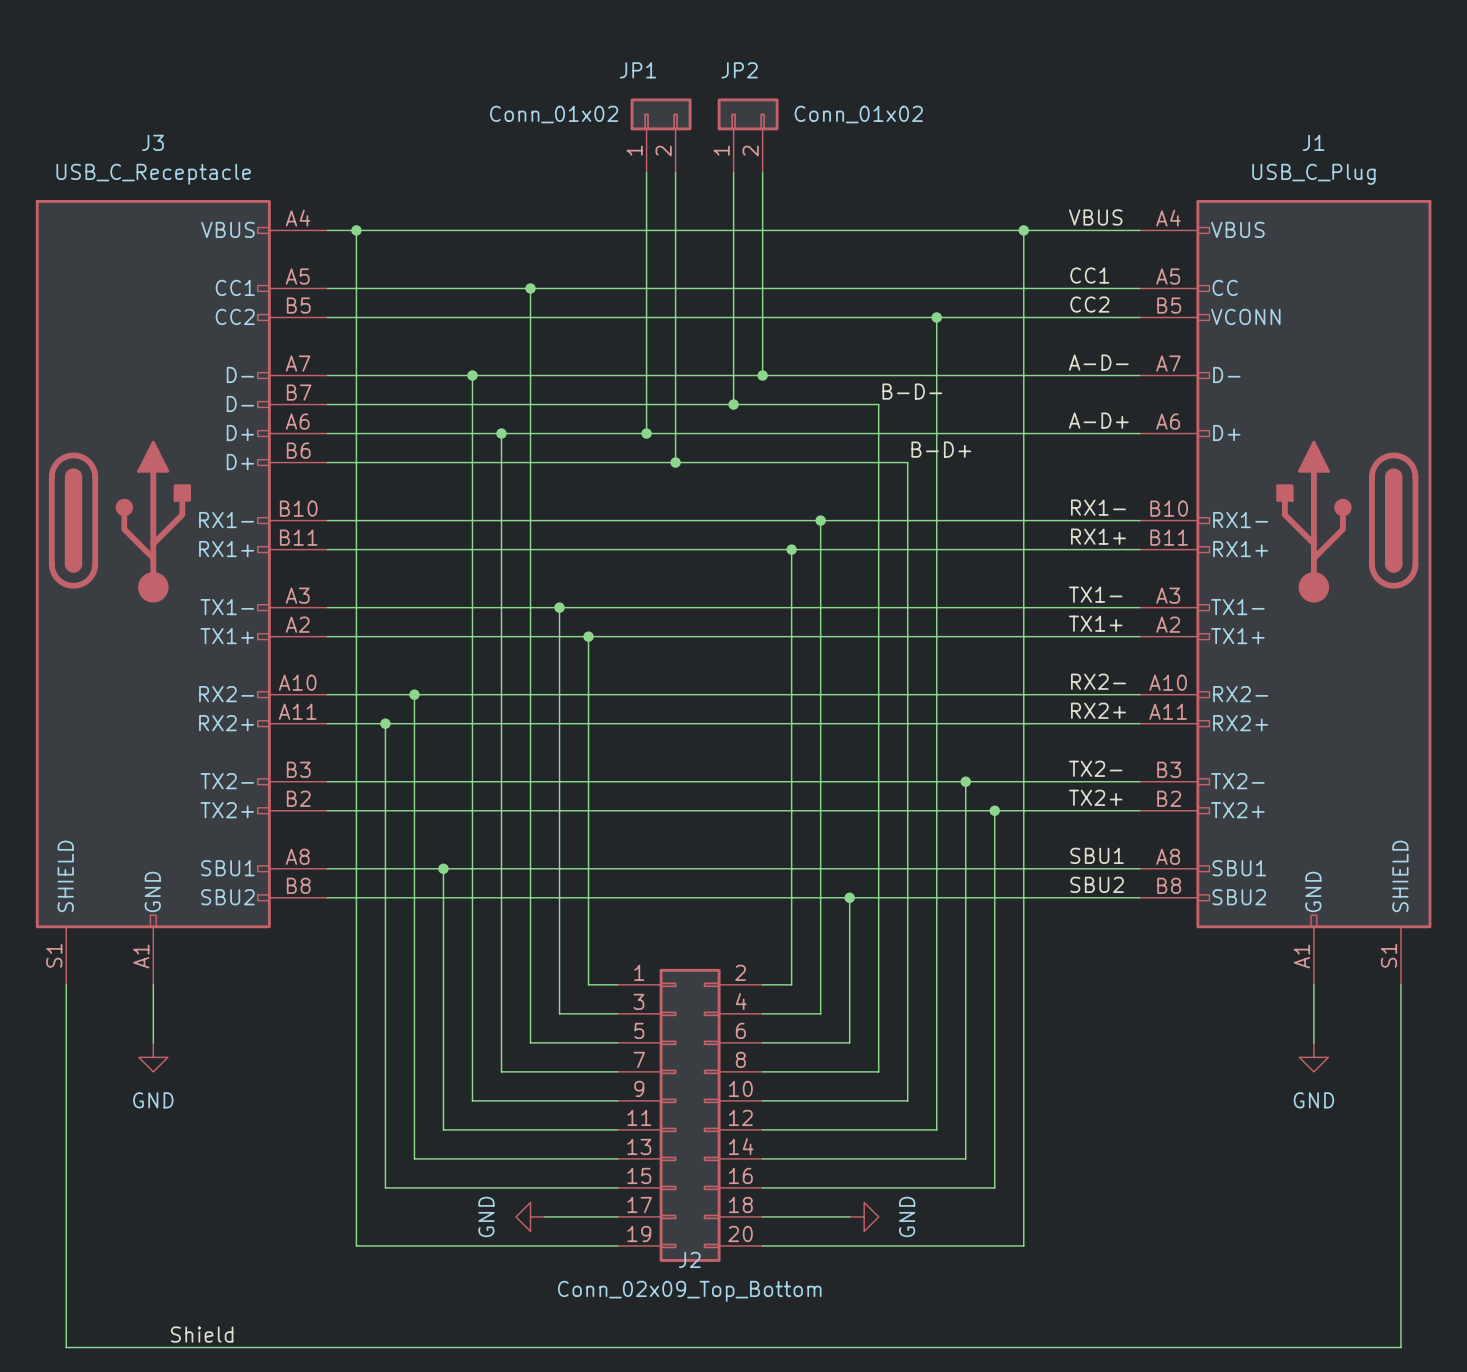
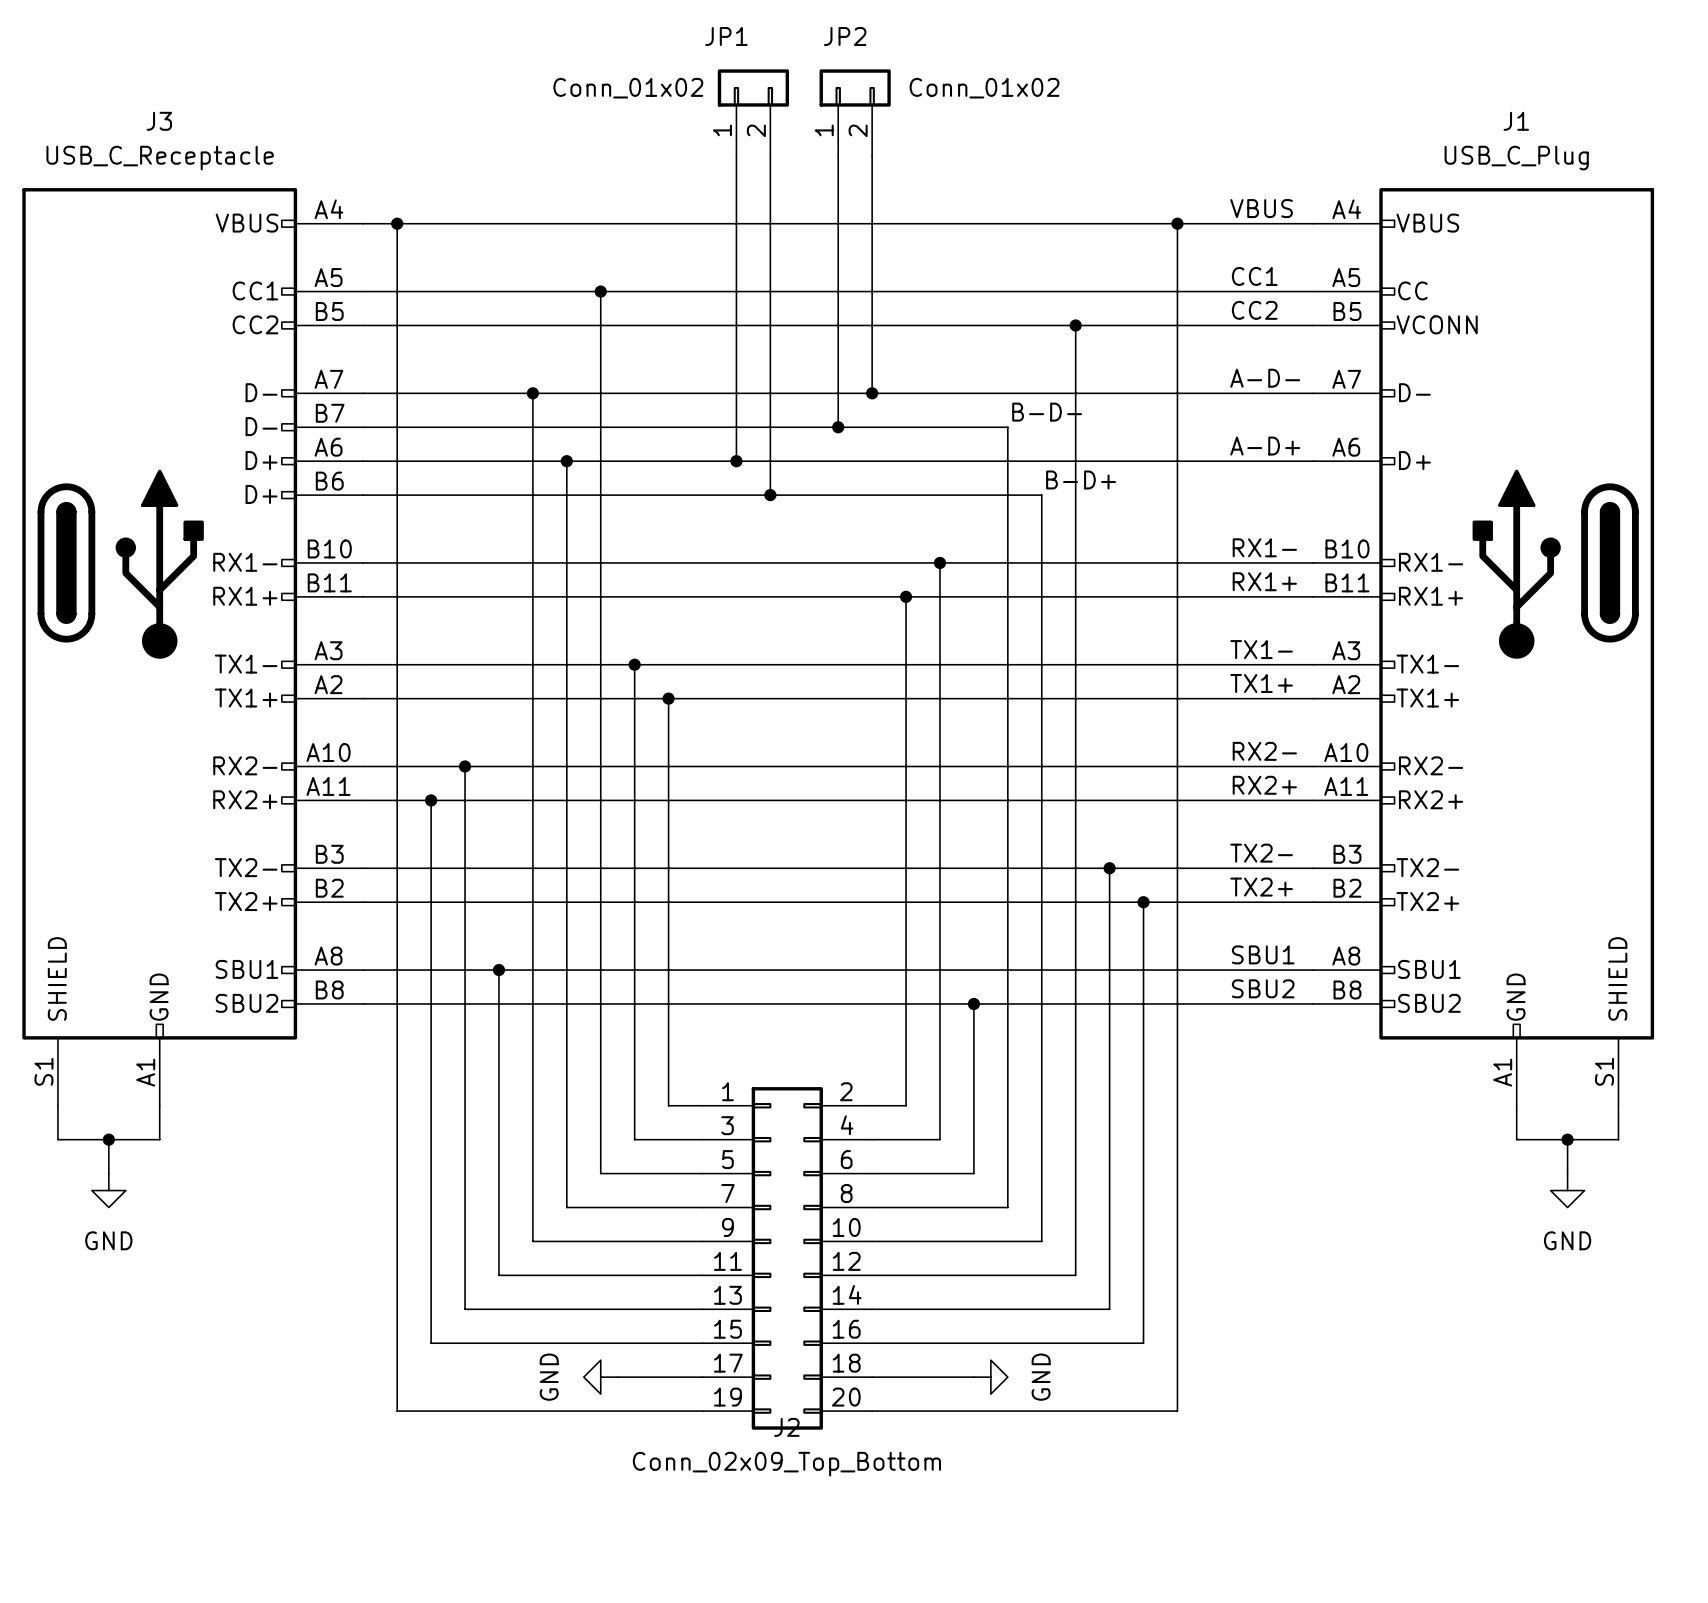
wire: (66, 1013) (66, 1347) (1400, 1347) (1400, 1013) -> none
wire: none -> (108, 1139) (108, 1173)
junction: none -> (108, 1139)
wire: (153, 1013) (153, 1042) -> (159, 1139) (57, 1139)
wire: (1313, 1013) (1313, 1042) -> (1516, 1139) (1618, 1139)
wire: none -> (1567, 1139) (1567, 1173)
junction: none -> (1567, 1139)
power symbol position: GND (153, 1057) -> GND (108, 1190)
power symbol position: GND (1313, 1057) -> GND (1567, 1190)
label: Shield (202, 1334) -> none

